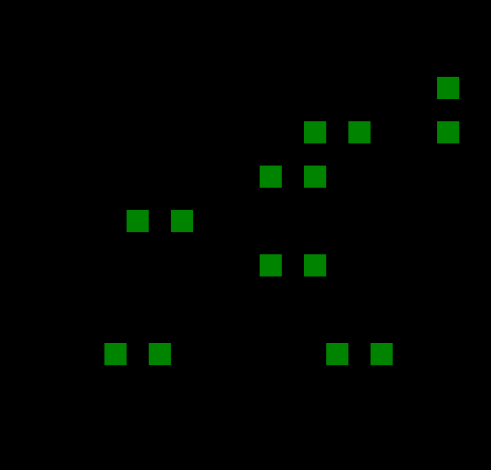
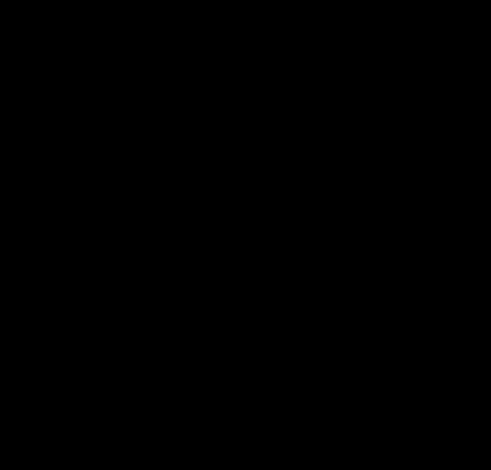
part: (448, 110) -> none
part: (337, 132) -> none
part: (292, 176) -> none
part: (159, 221) -> none
part: (292, 265) -> none
part: (137, 354) -> none
part: (359, 354) -> none

